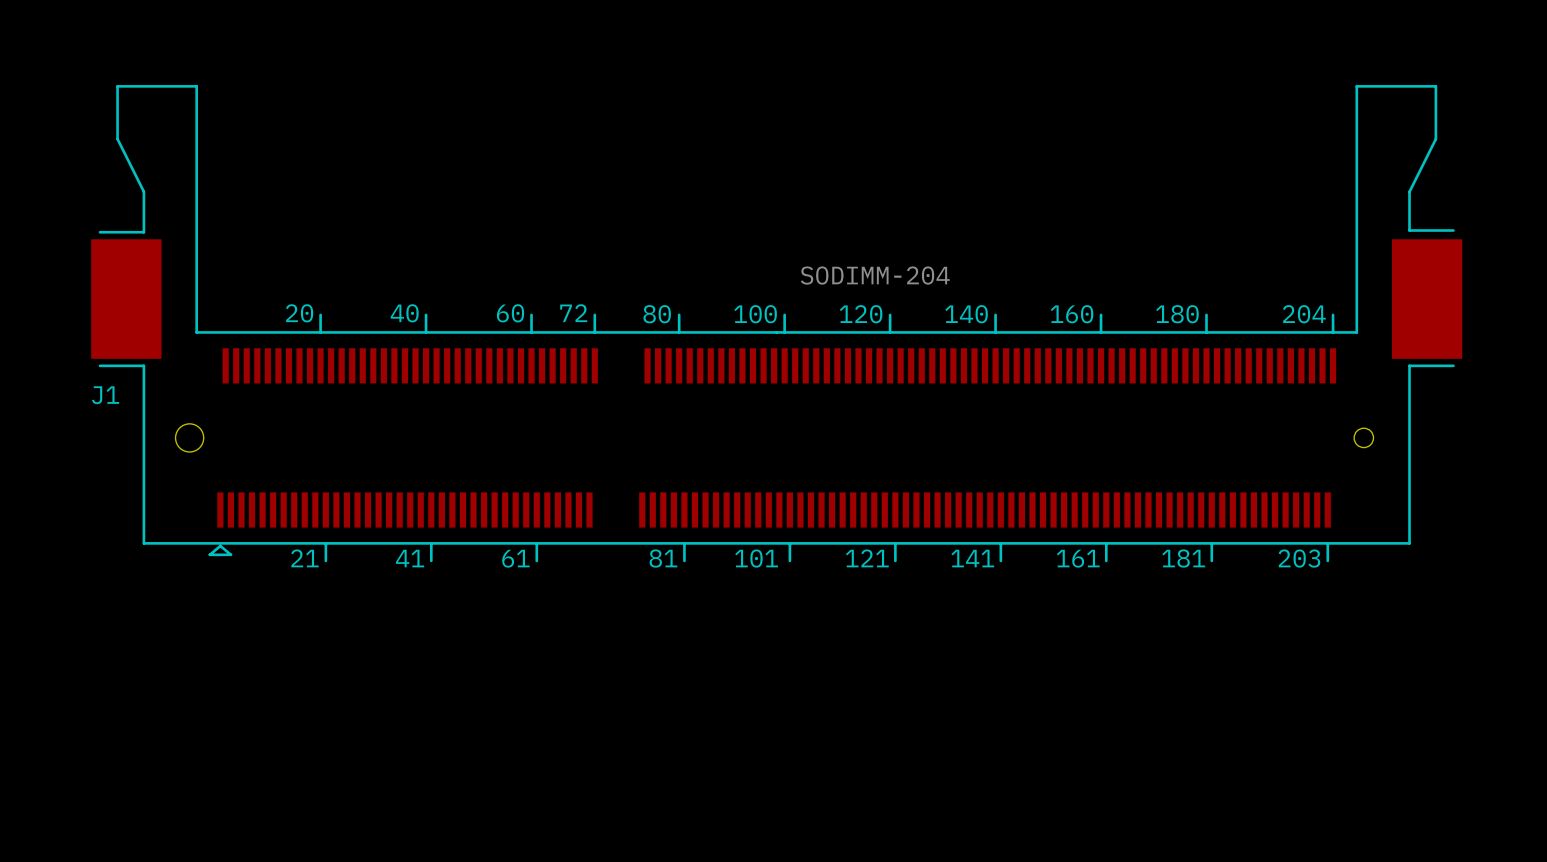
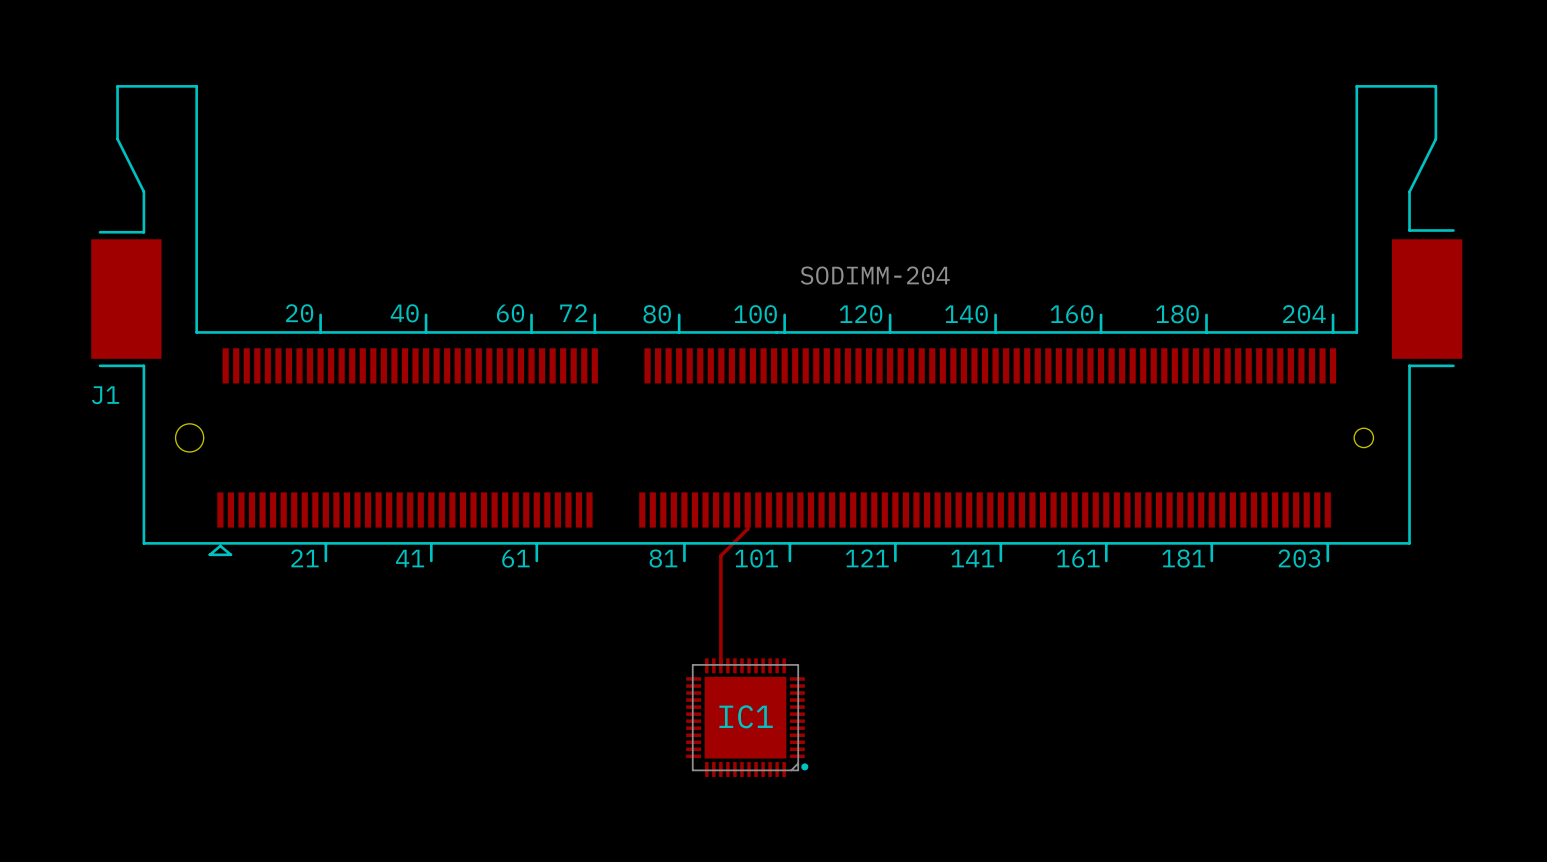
top track: none -> (747, 509) (747, 528) (720, 555) (720, 665)
IC1: none -> (747, 717)

